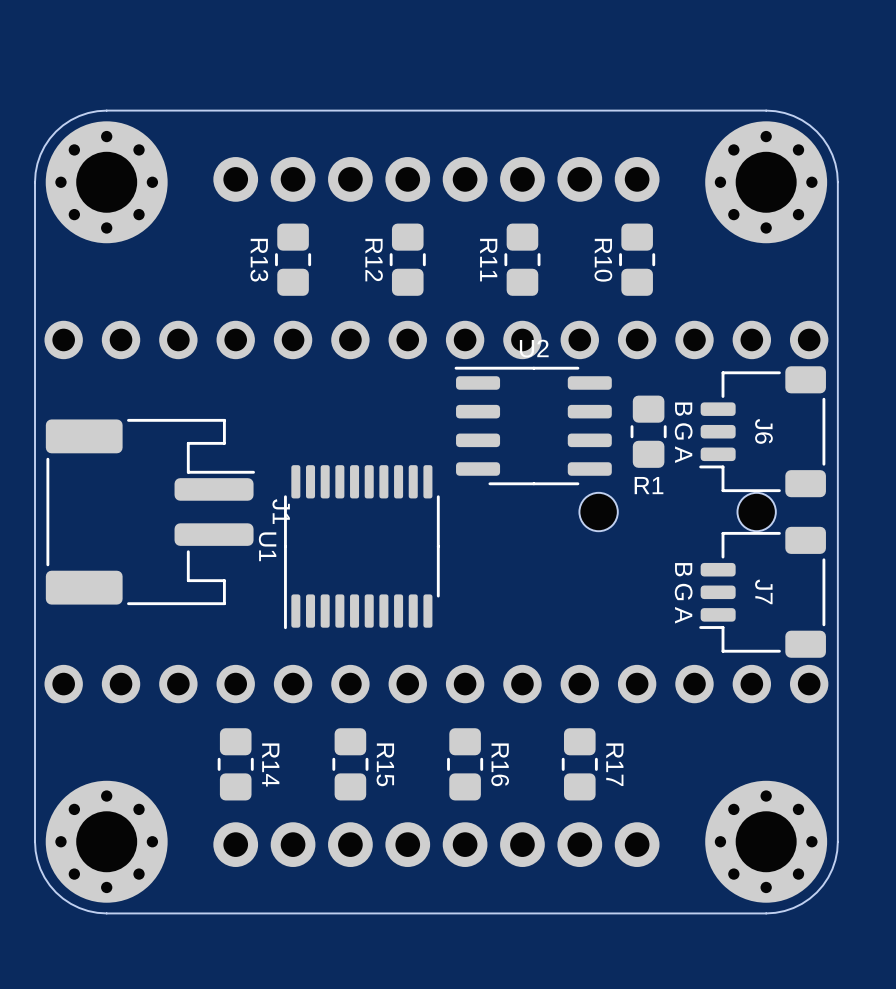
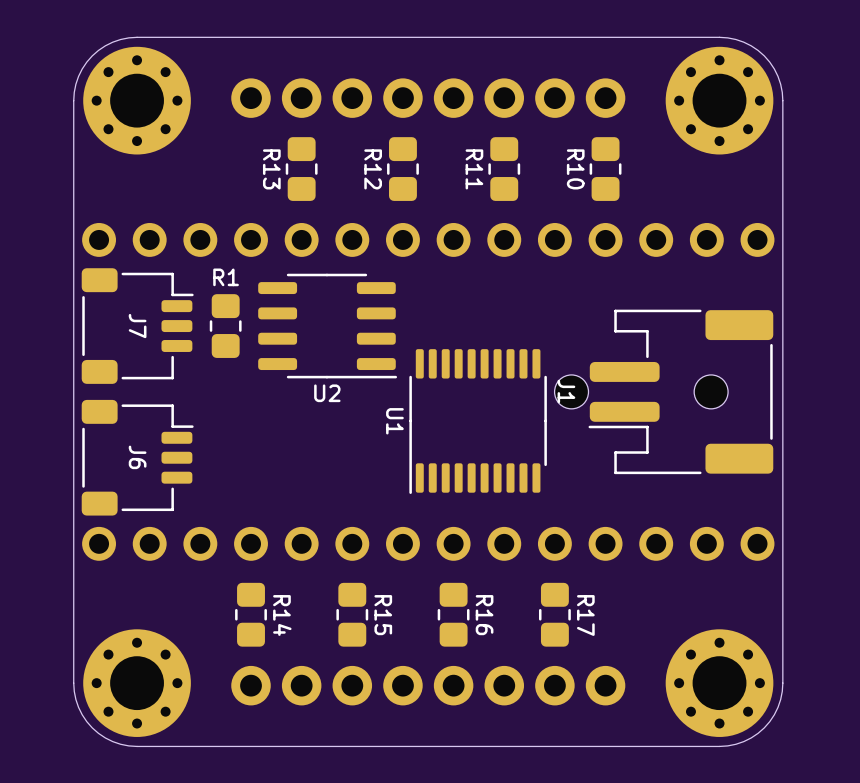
text: B (683, 409) -> none
U2 rotation: 0° (533, 425) -> 180° (327, 326)
U2 position: (533, 425) -> (327, 326)
R1 position: (648, 431) -> (225, 326)
text: G (683, 431) -> none
J6 rotation: 0° (762, 431) -> 180° (137, 457)
J6 position: (762, 431) -> (137, 457)
text: A (683, 454) -> none
R1 name position: R1 (649, 485) -> R1 (226, 277)
J1 rotation: 0° (150, 512) -> 180° (680, 391)
J1 position: (150, 512) -> (680, 391)
U1 position: (361, 547) -> (478, 421)
text: B (683, 569) -> none
text: G (683, 591) -> none
J7 rotation: 0° (762, 592) -> 180° (137, 326)
J7 position: (762, 592) -> (137, 326)
text: A (683, 615) -> none

